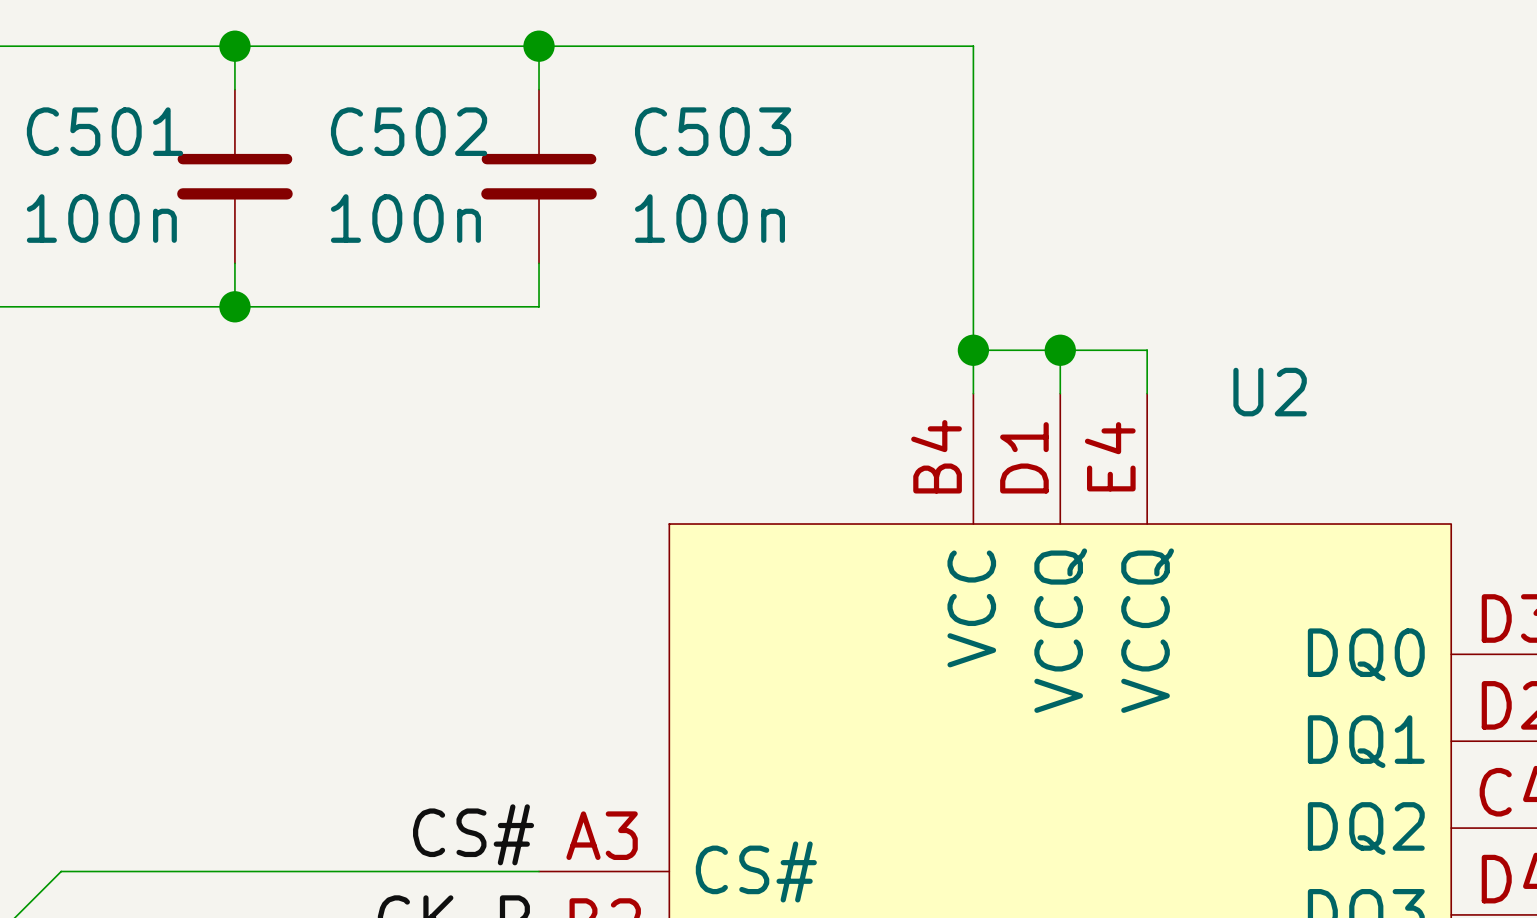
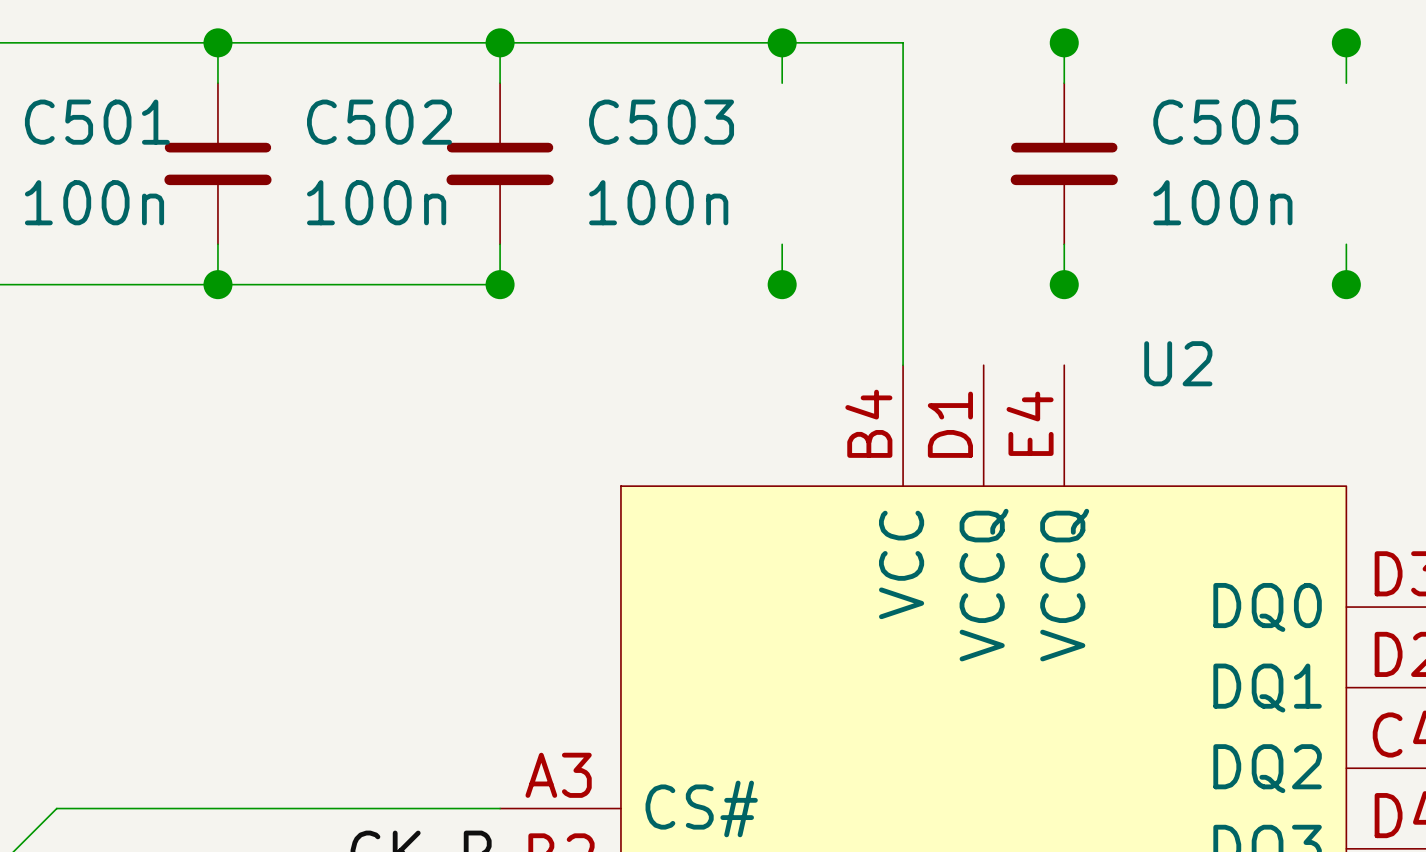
wire: none -> (782, 42) (782, 83)
junction: none -> (782, 42)
wire: none -> (1064, 42) (1064, 83)
junction: none -> (1064, 42)
wire: none -> (1346, 42) (1346, 83)
junction: none -> (1346, 42)
C505: none -> 100n (1064, 163)
wire: none -> (782, 244) (782, 284)
wire: none -> (1346, 244) (1346, 284)
junction: none -> (500, 284)
junction: none -> (782, 284)
junction: none -> (1064, 284)
junction: none -> (1346, 284)
wire: (973, 350) (1147, 350) (1147, 393) -> none
junction: (973, 350) -> none
wire: (1060, 350) (1060, 393) -> (1064, 244) (1064, 284)
junction: (1060, 350) -> none
label: CS# (473, 834) -> none

